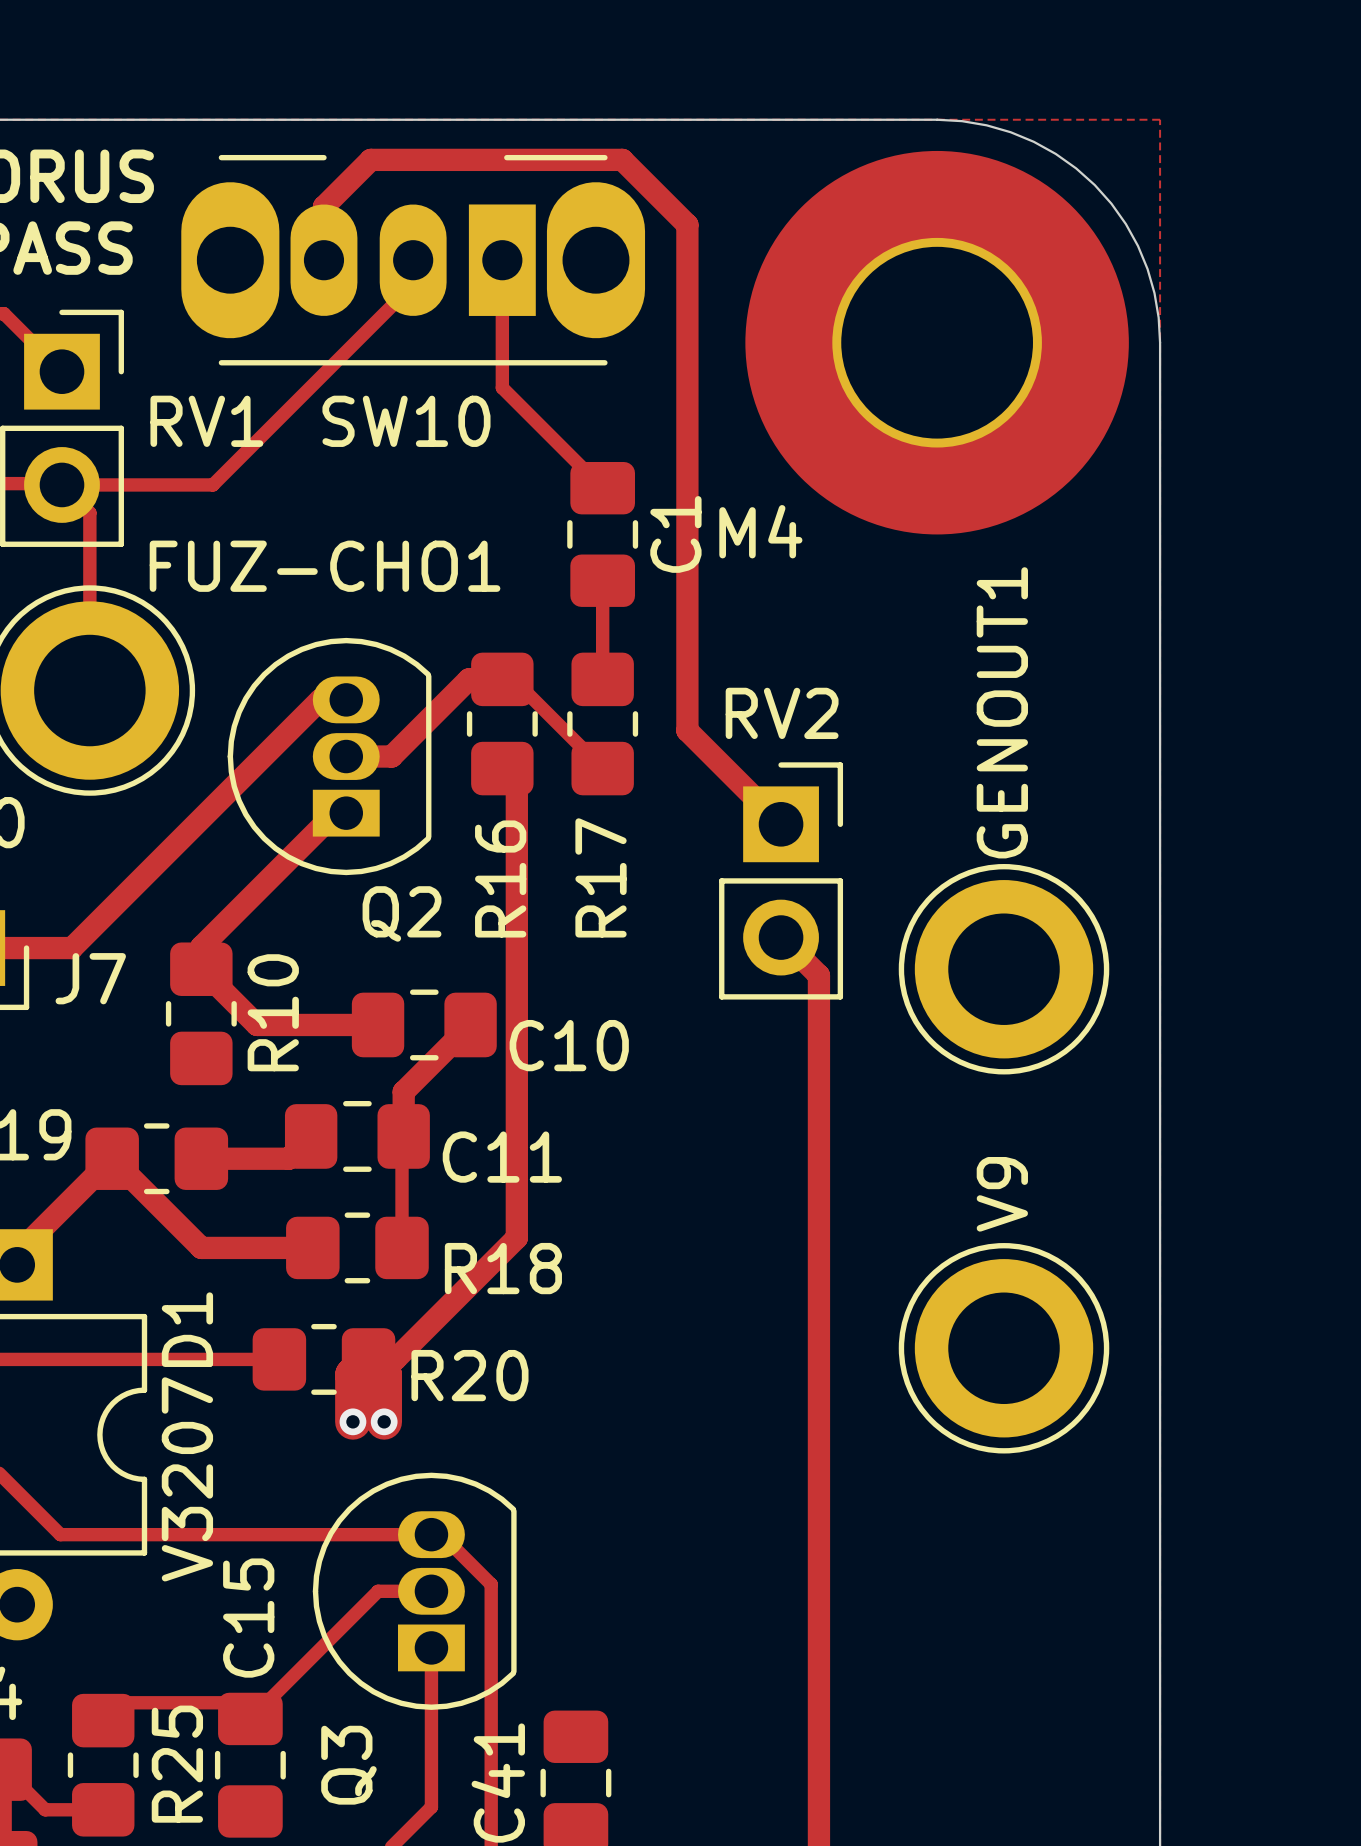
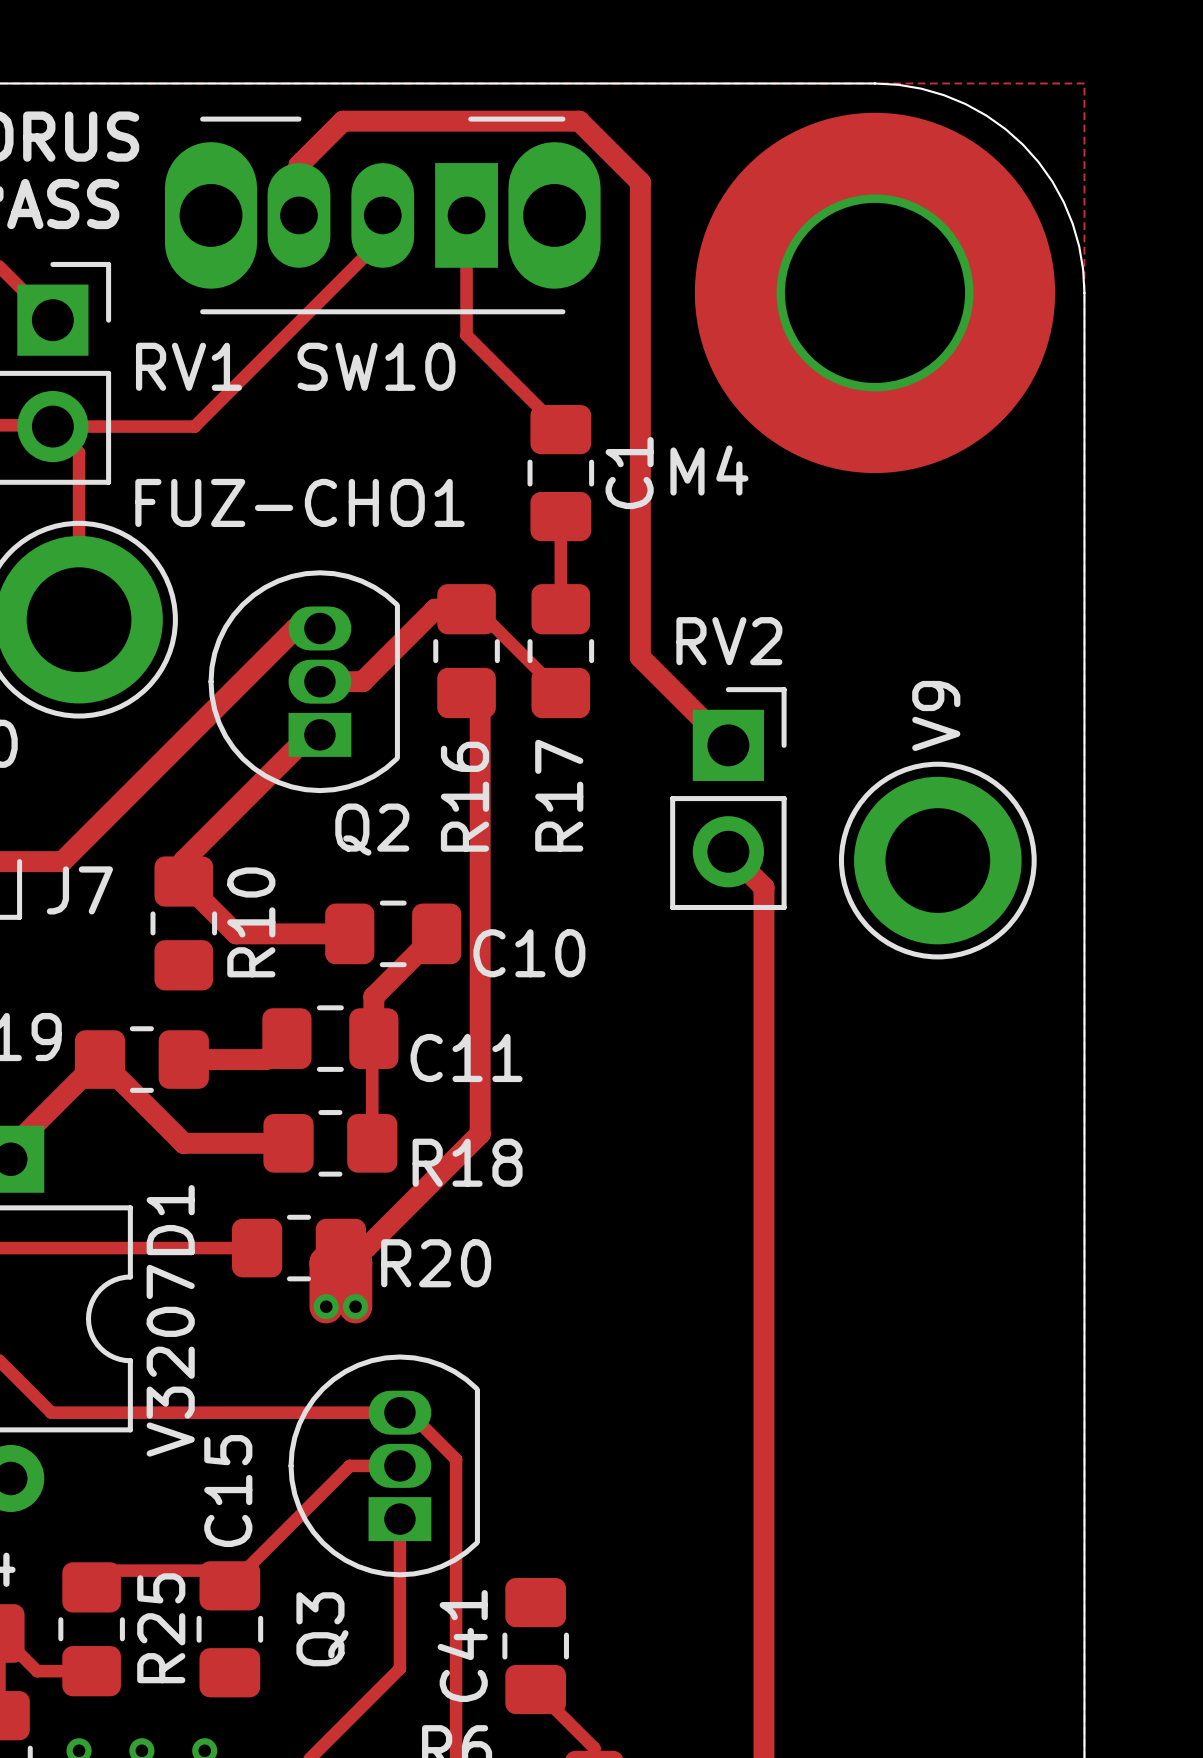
GENOUT1: (1004, 969) -> none
V9 position: (1004, 1348) -> (937, 860)

